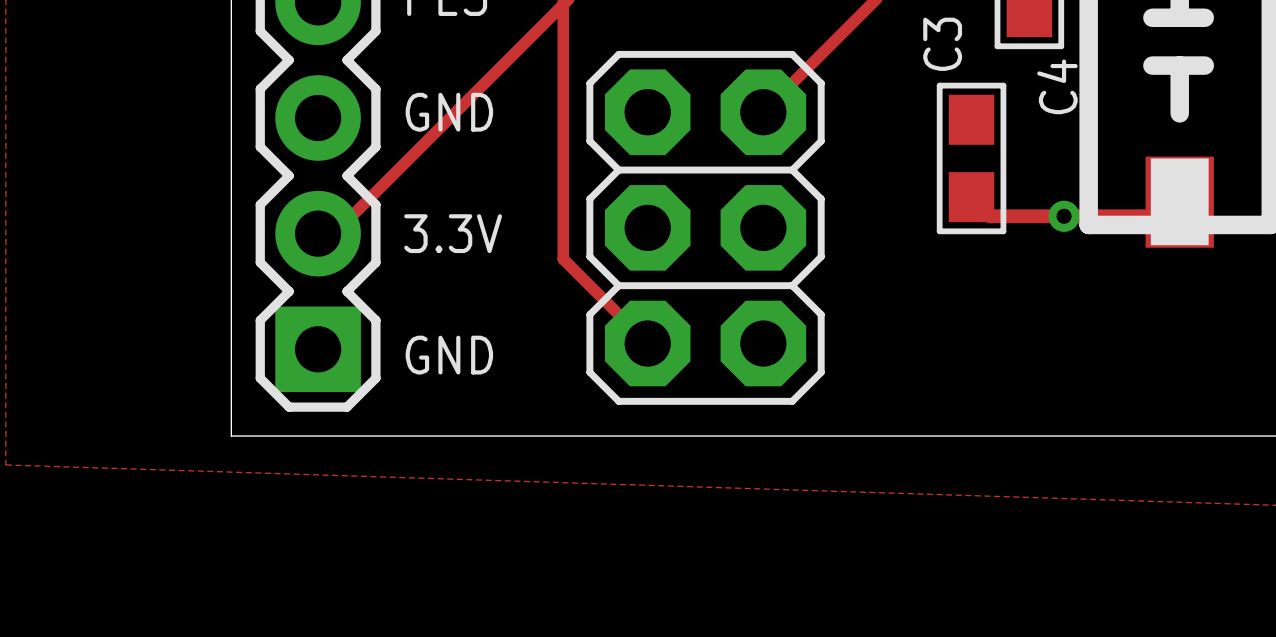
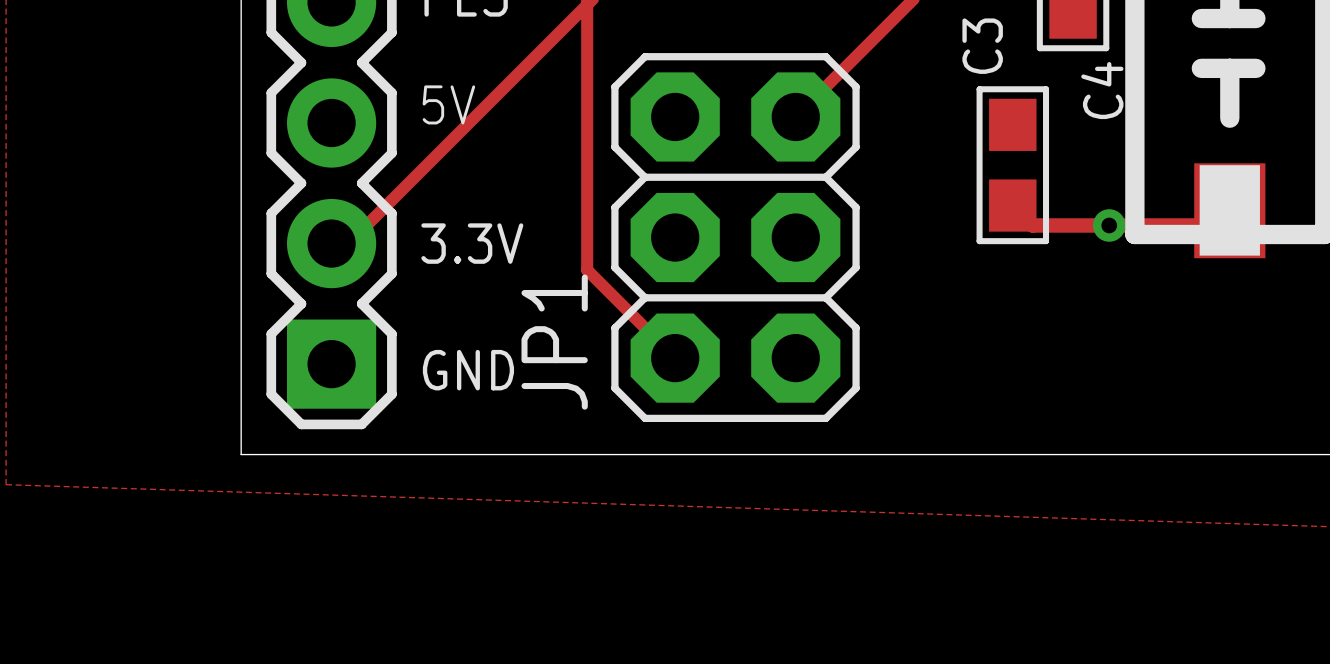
text: GND (449, 112) -> 5V (448, 104)
JP1 name: none -> JP1 (554, 342)

